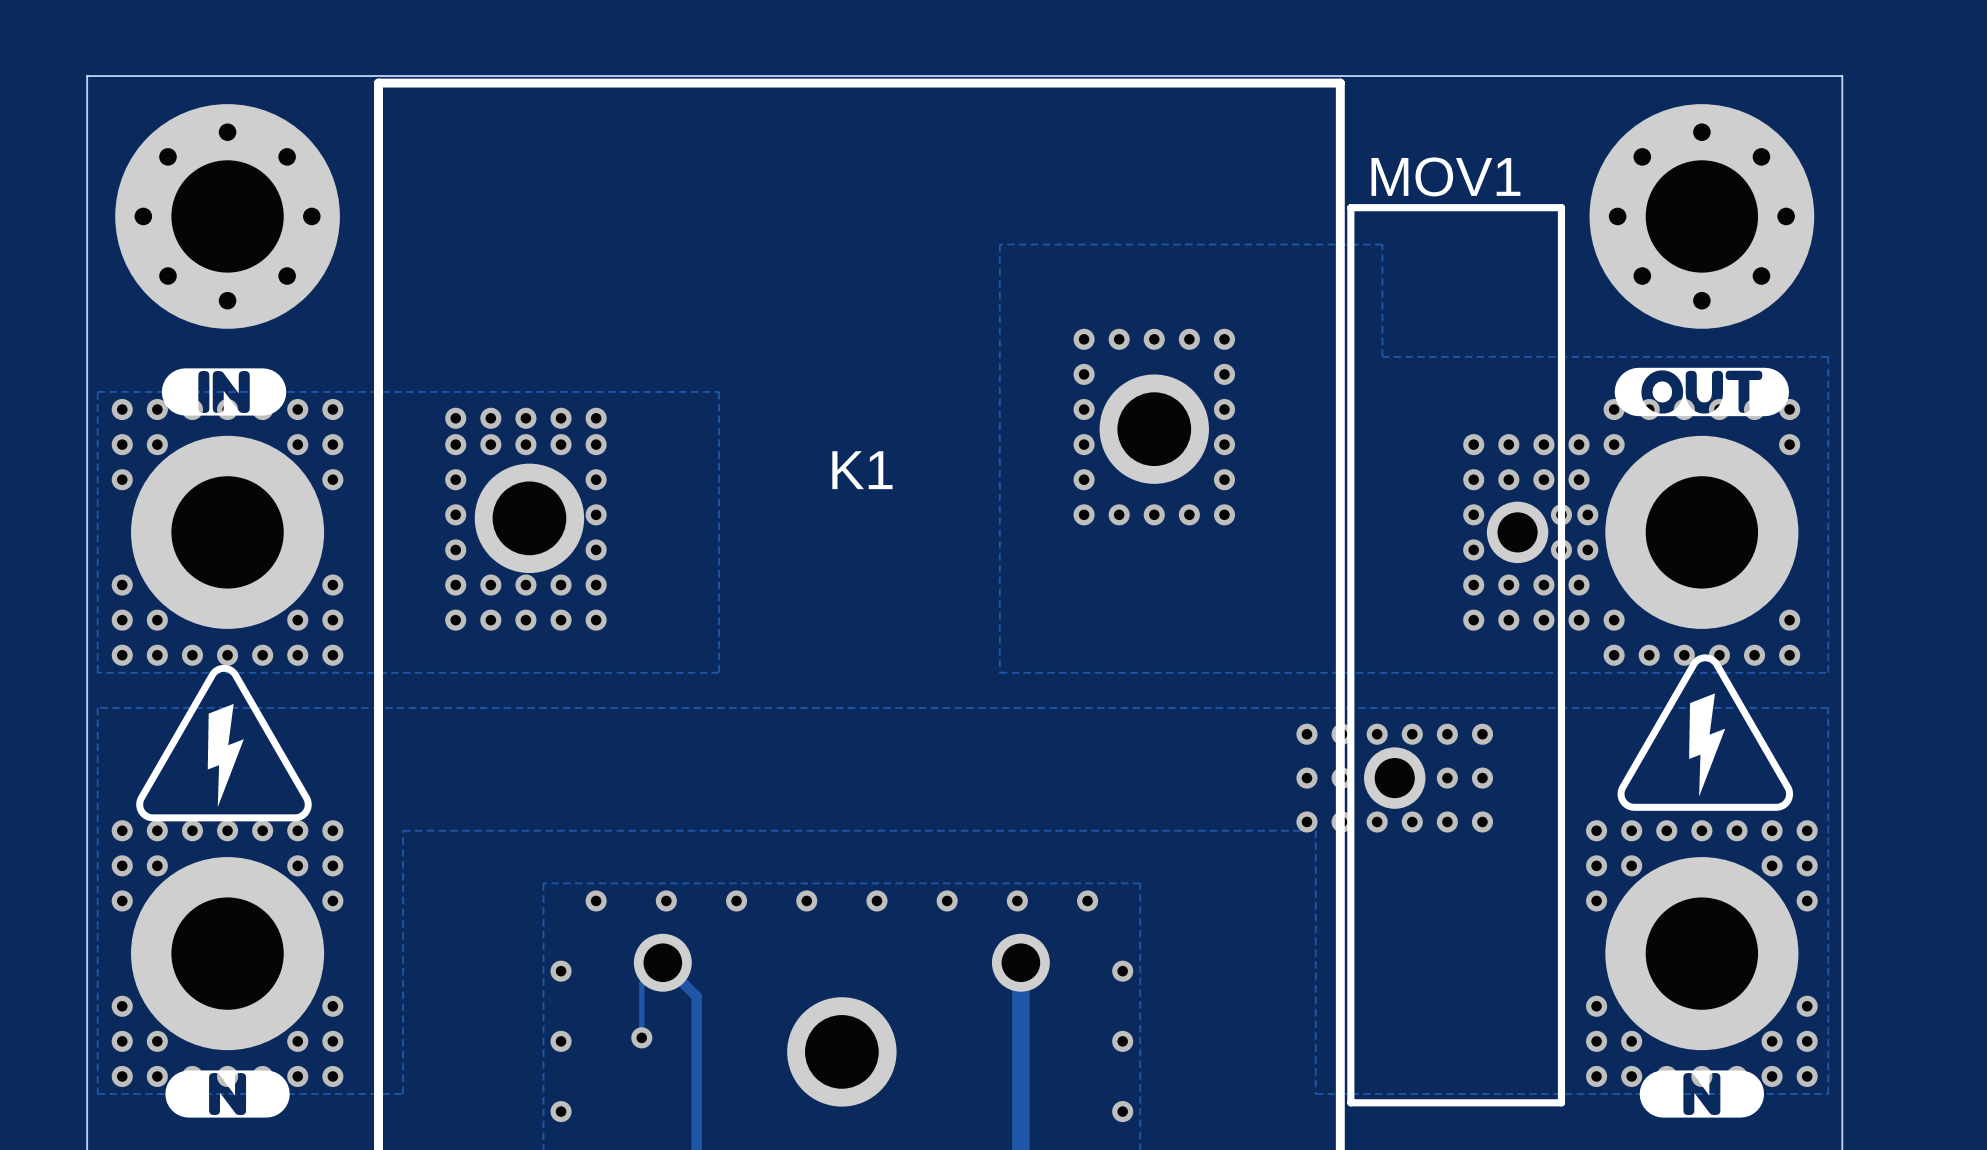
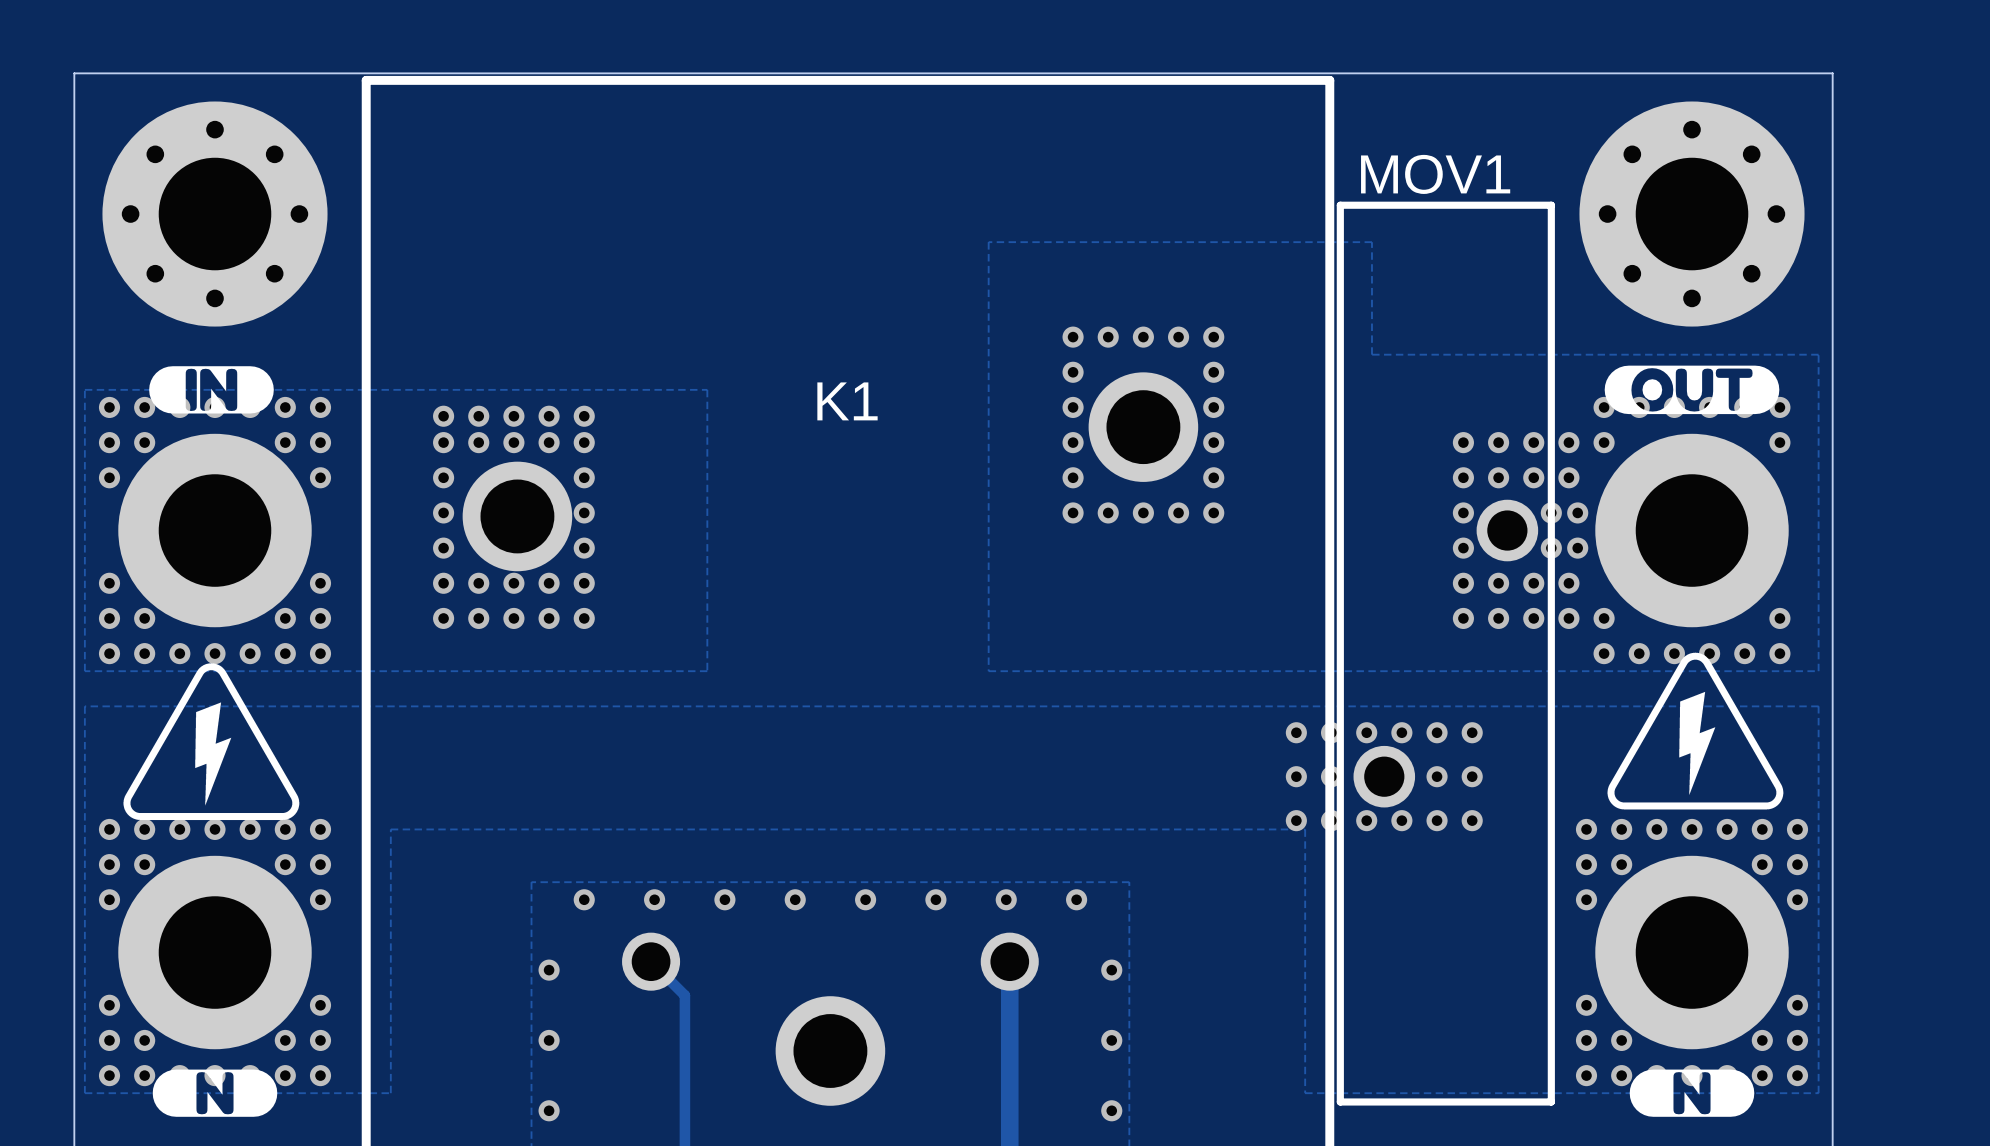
K1 name position: K1 (862, 470) -> K1 (847, 401)
track: (662, 962) (641, 983) (641, 1037) -> none
via: (641, 1037) -> none

